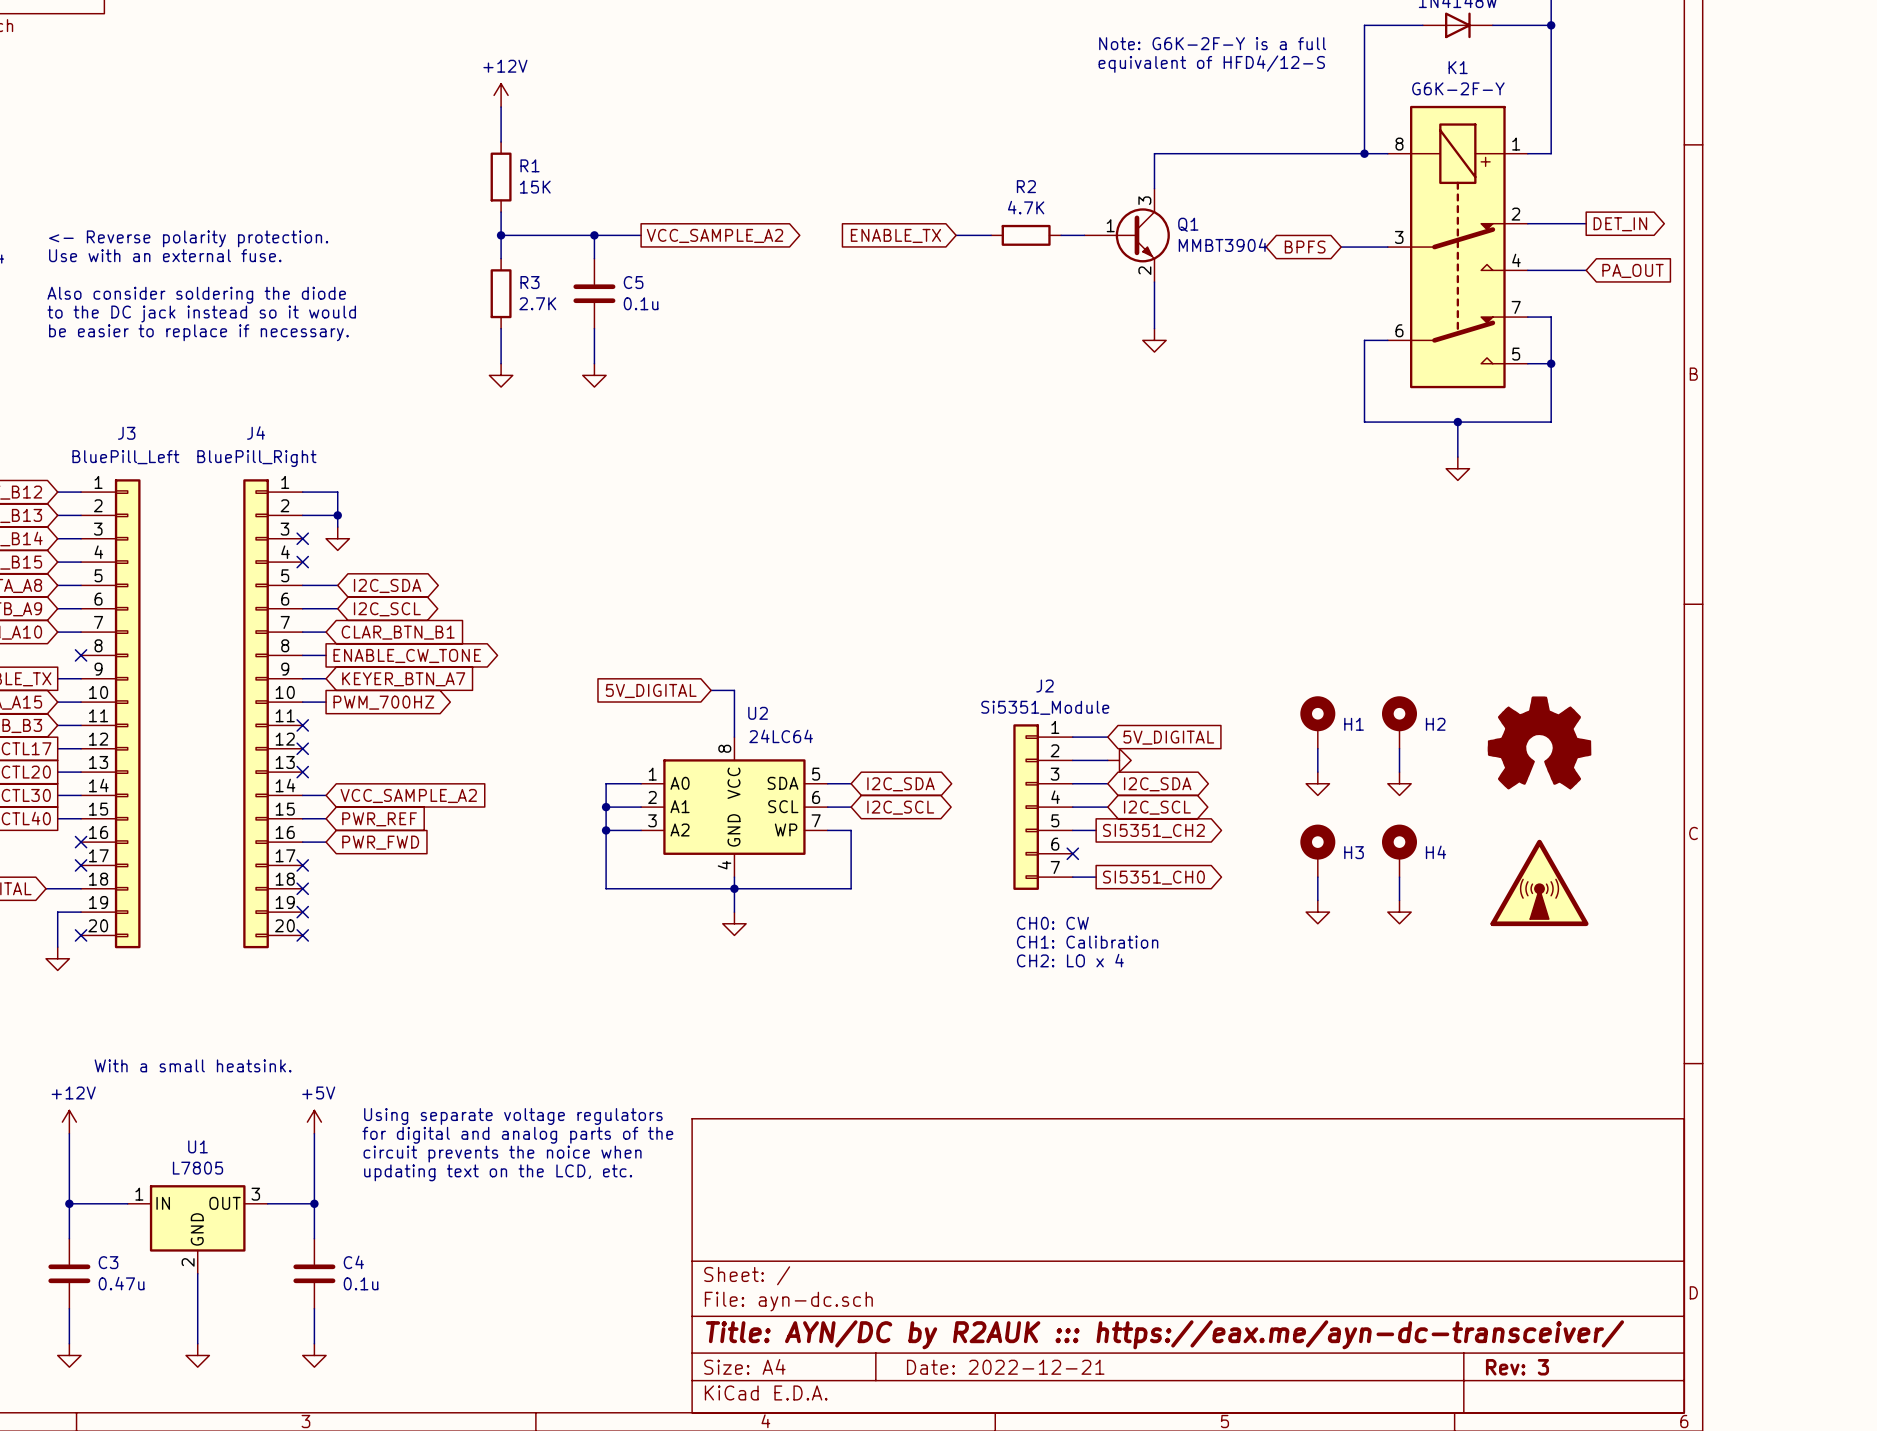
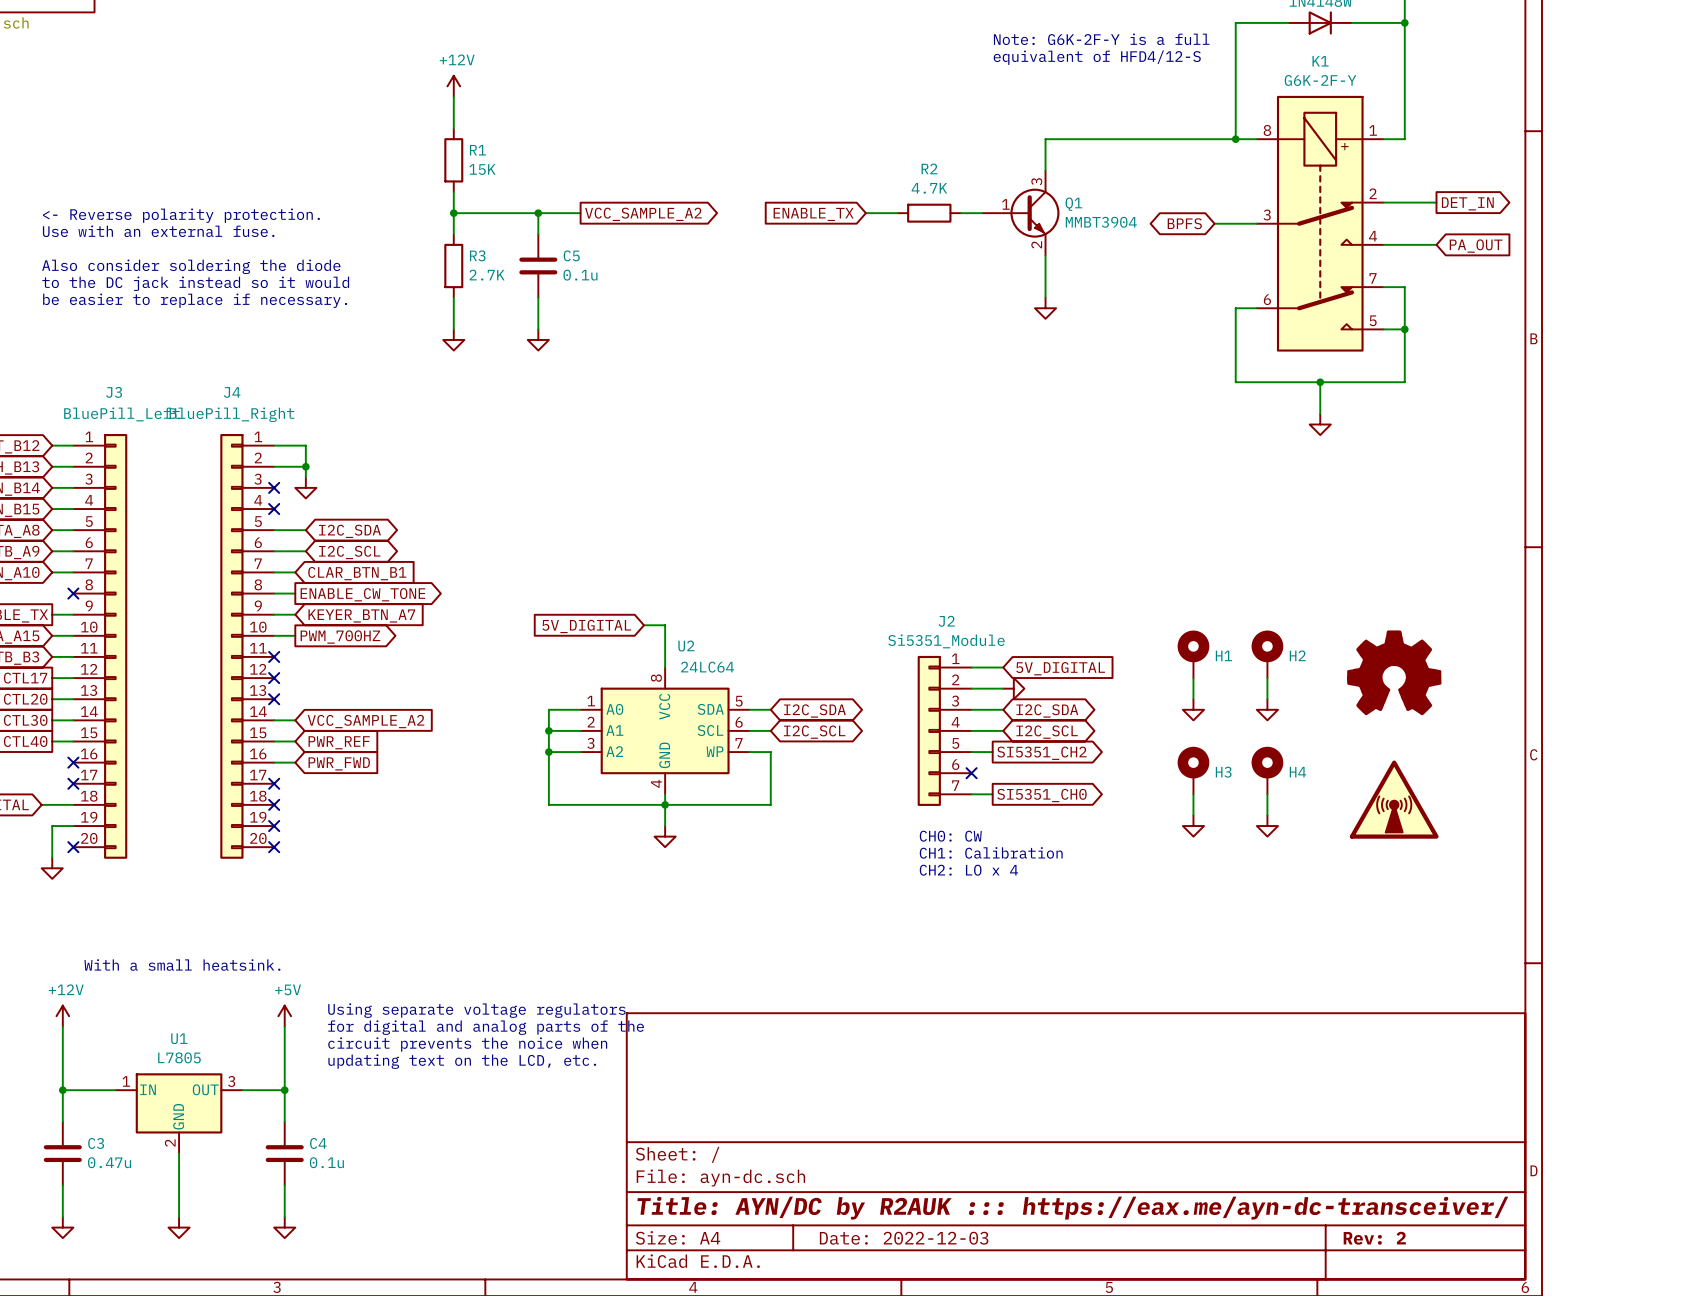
title block: Date: 2022-12-21 (1005, 1367) -> Date: 2022-12-03 (904, 1238)
title block: Rev: 3 (1517, 1367) -> Rev: 2 (1374, 1238)

